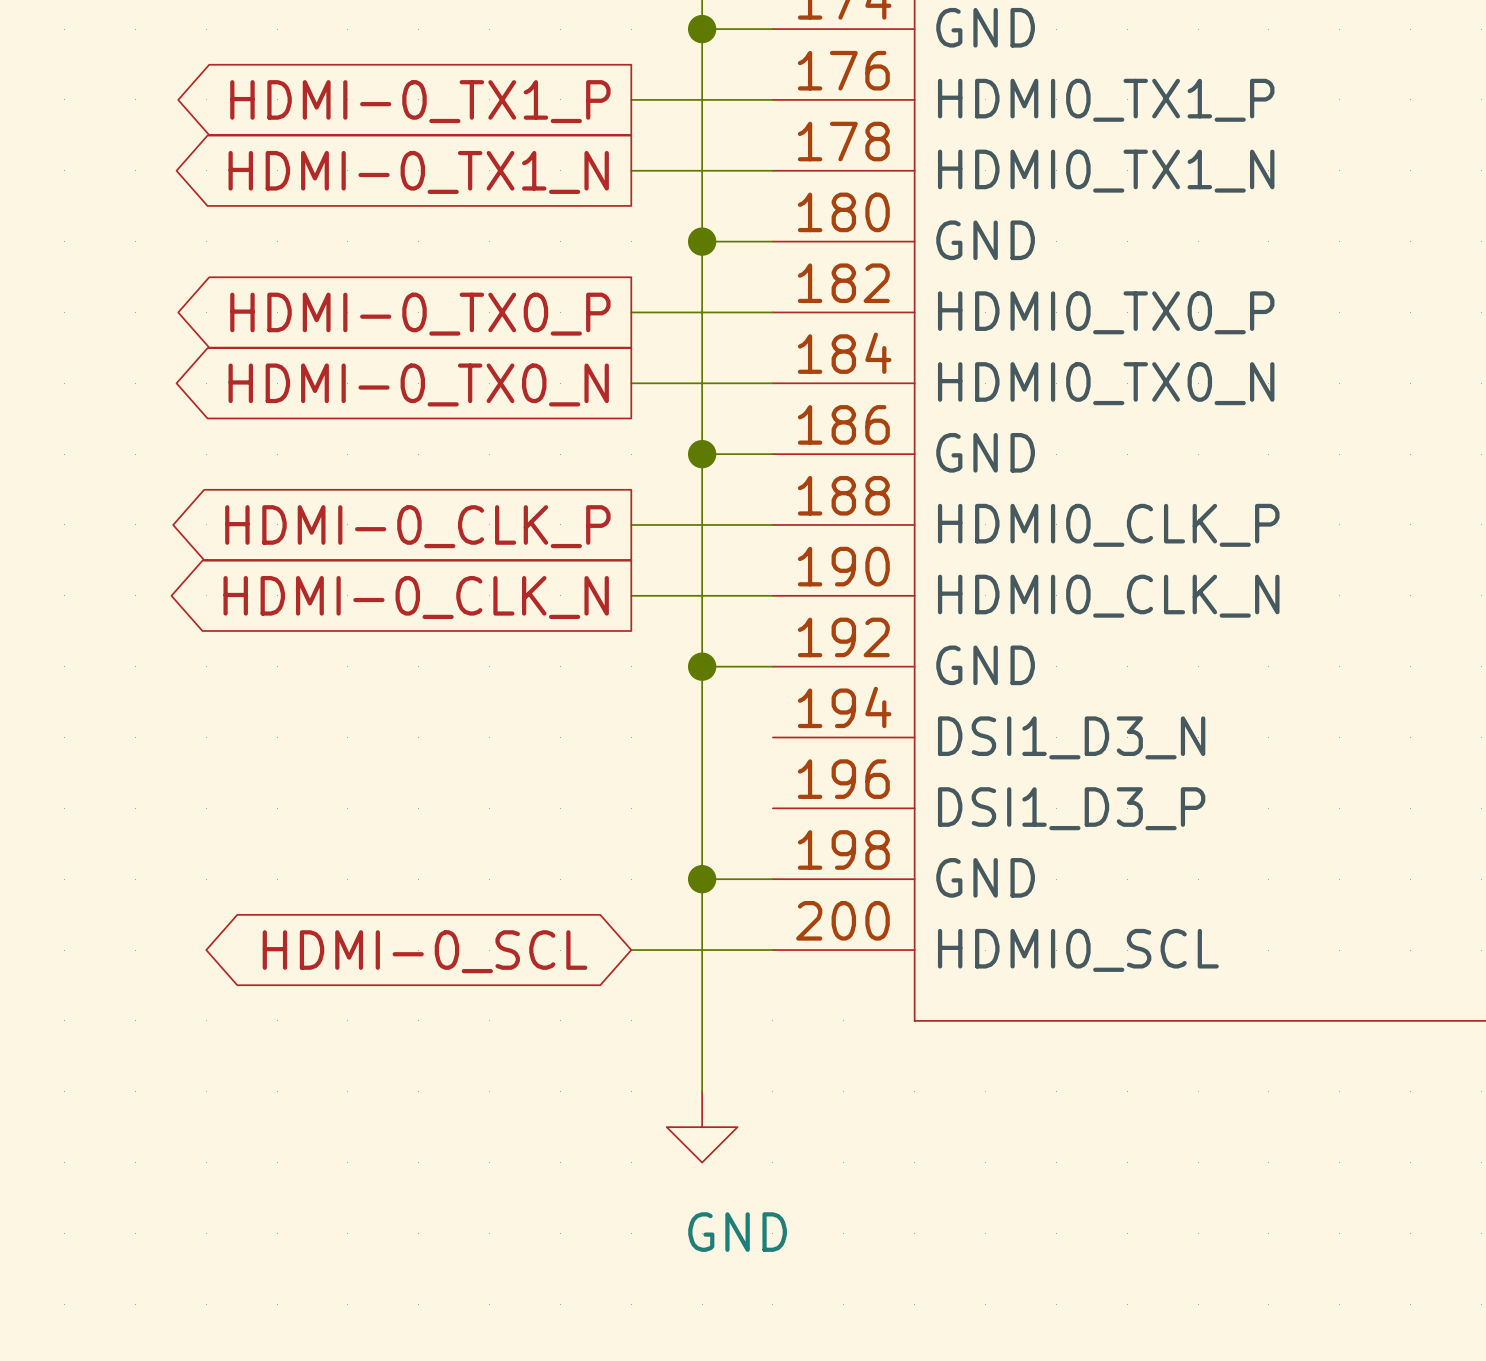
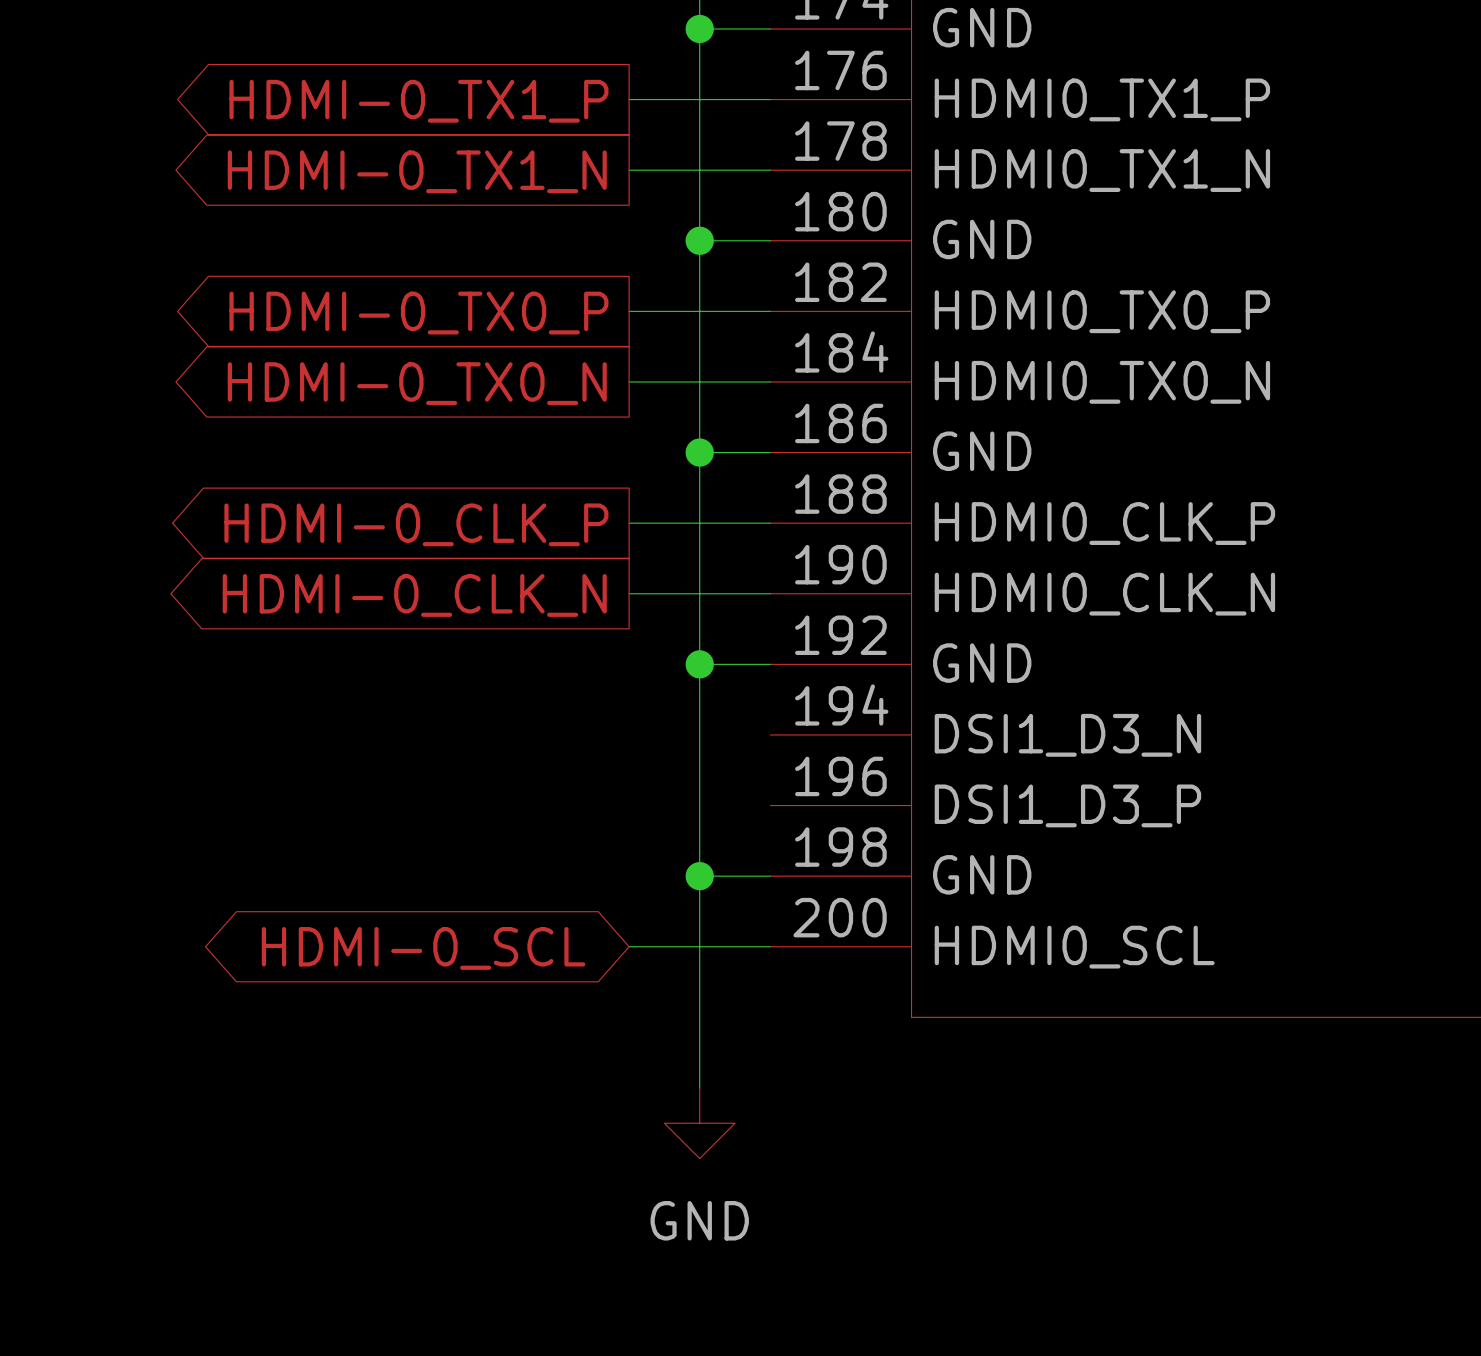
power symbol text position: GND (737, 1232) -> GND (699, 1220)

